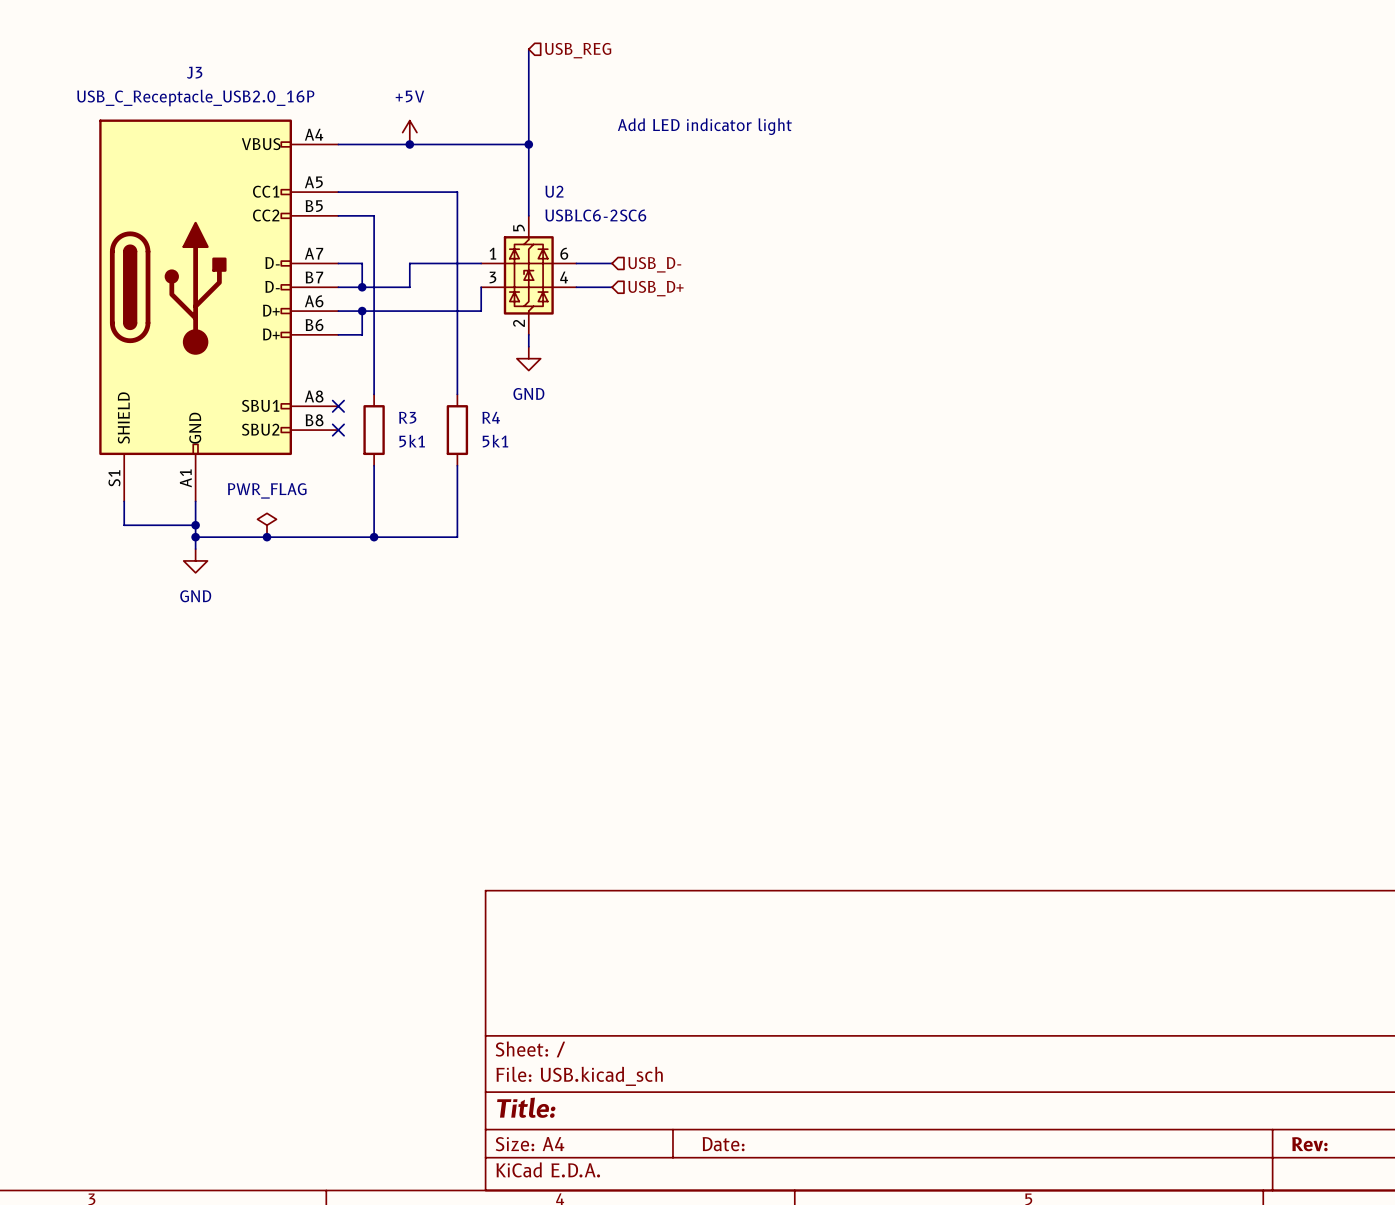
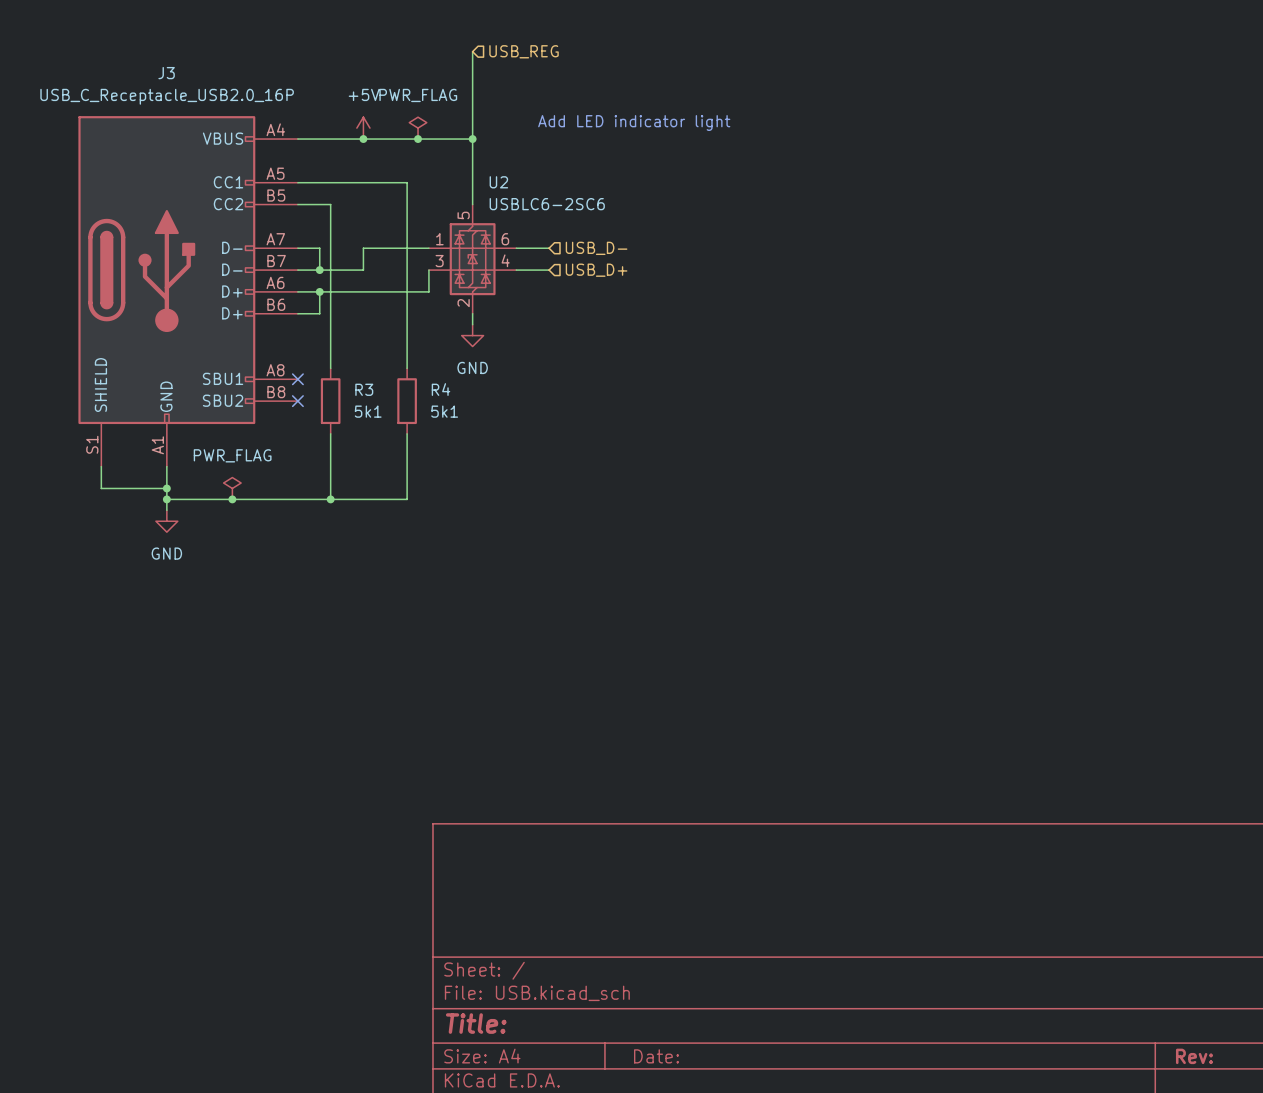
power symbol: none -> PWR_FLAG (418, 128)
junction: none -> (418, 139)

